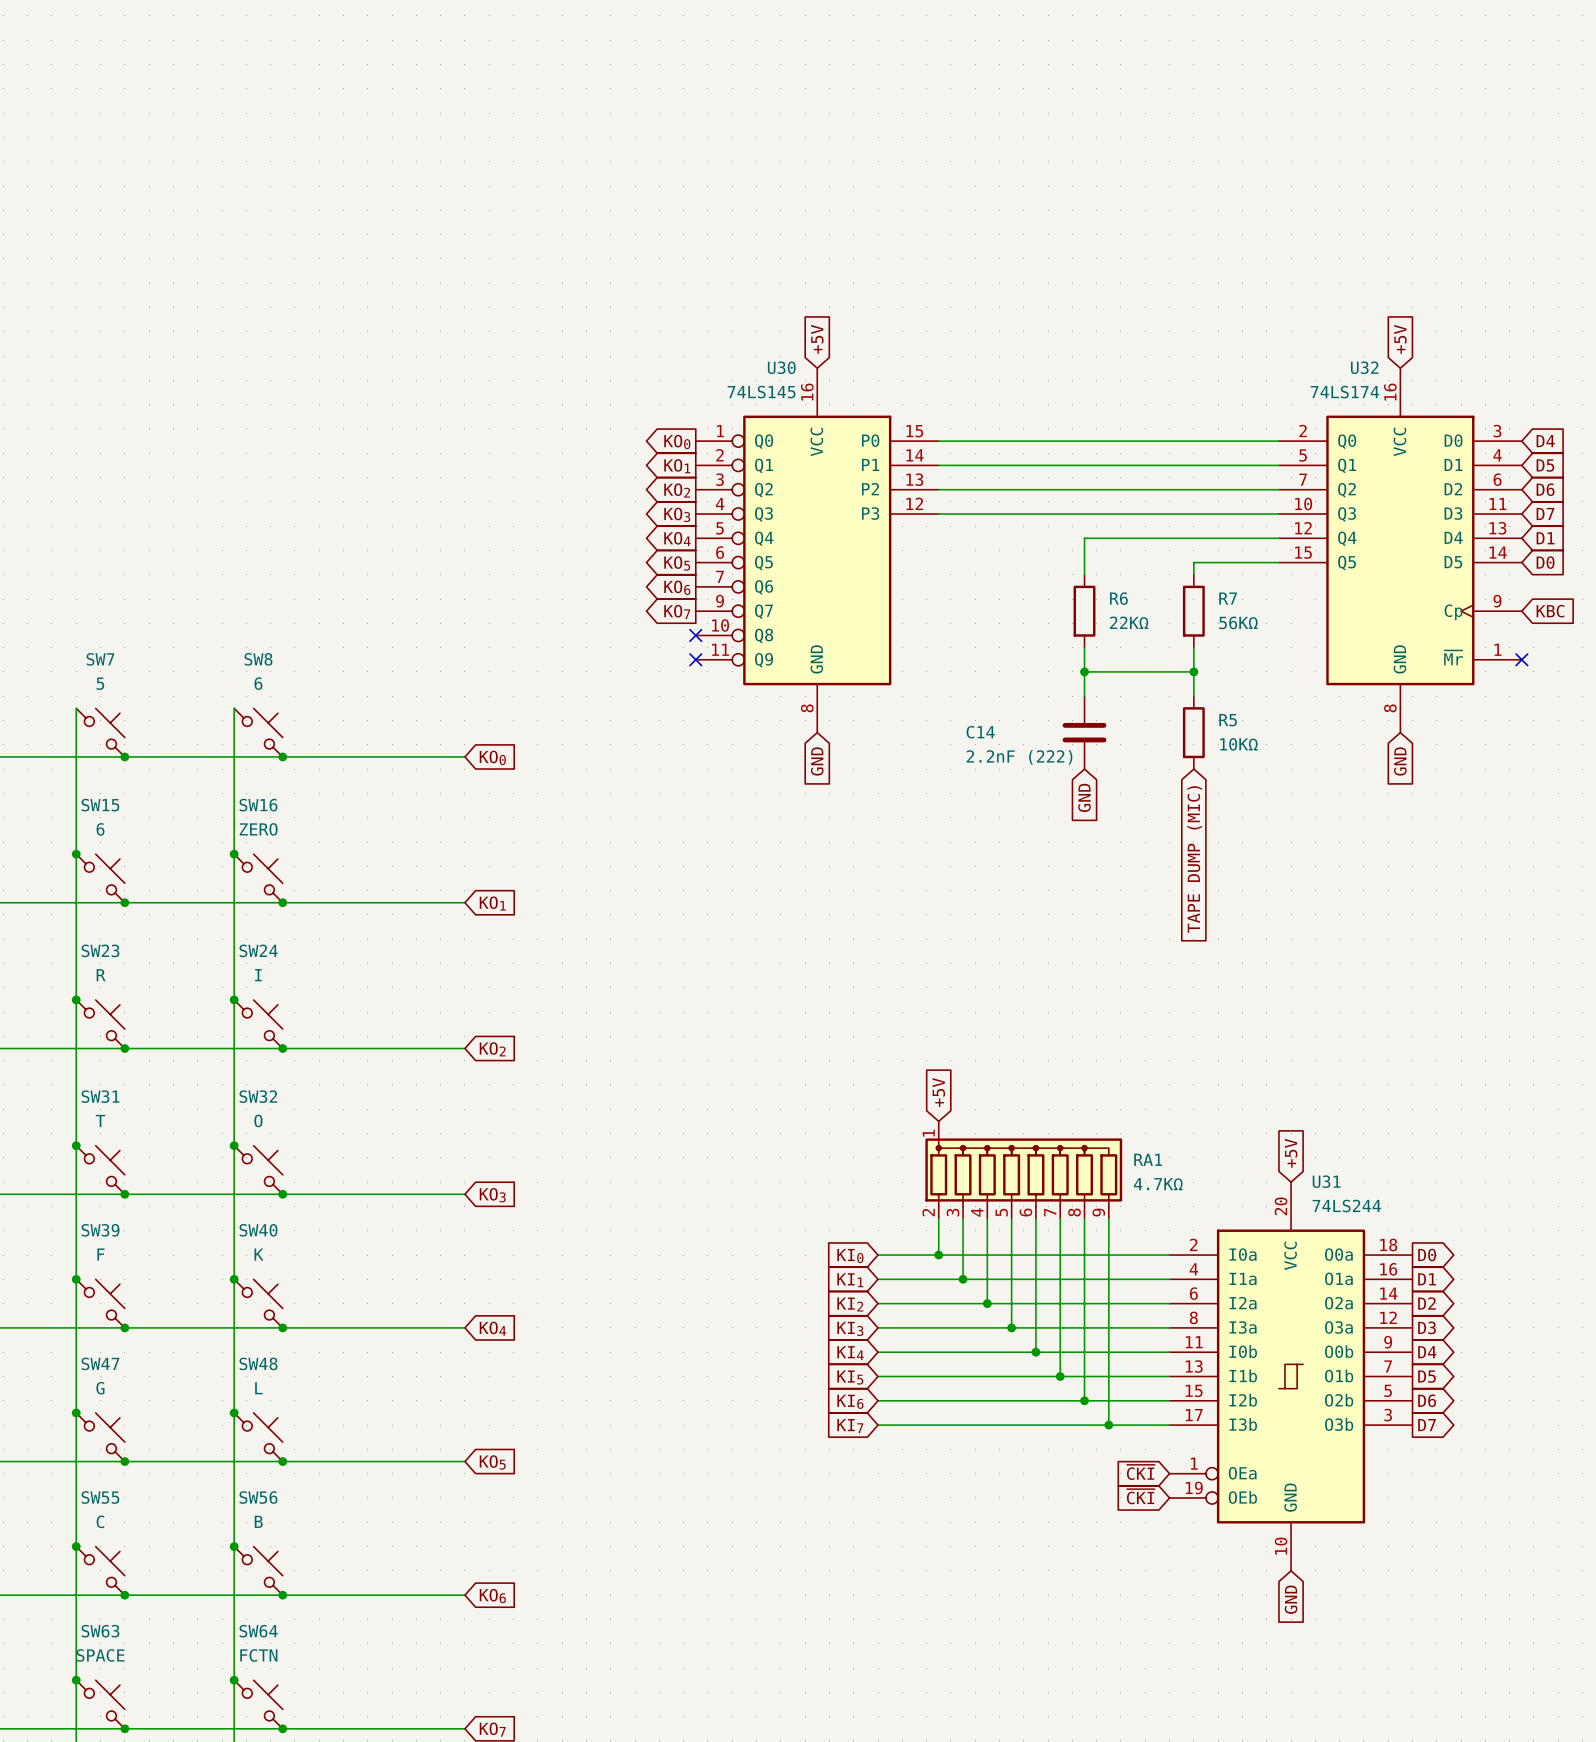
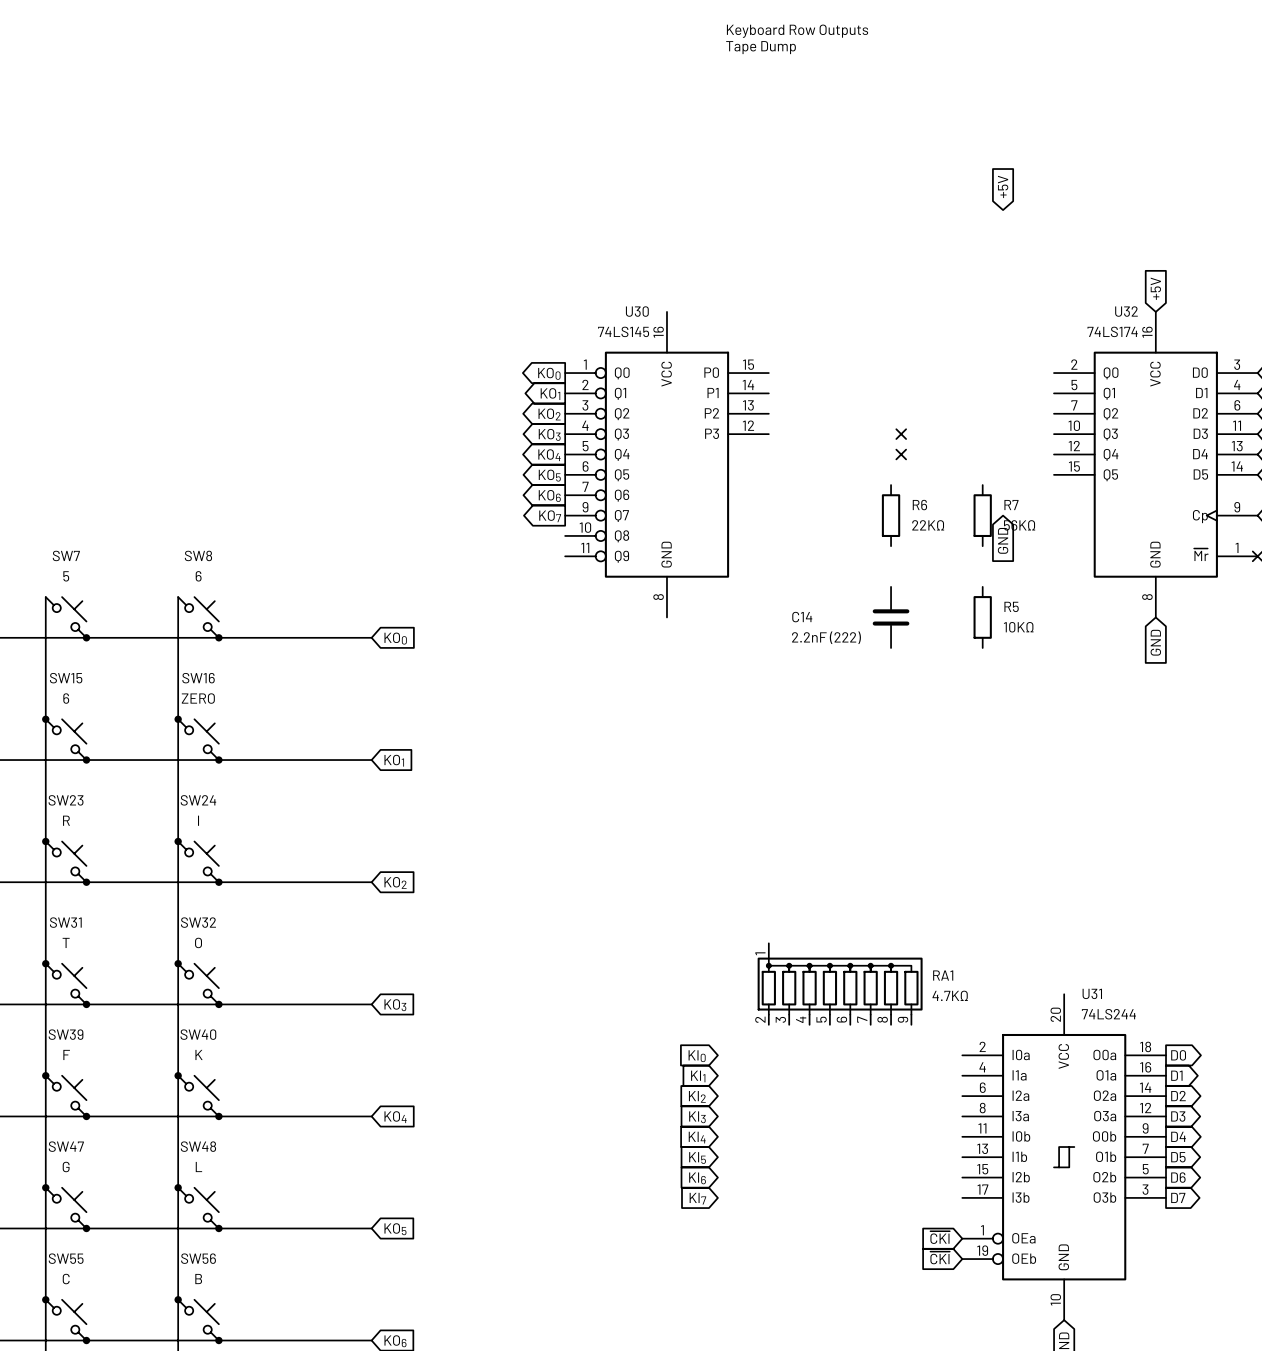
text: none -> Keyboard Row Outputs (797, 31)
text: none -> Tape Dump (761, 47)
global label: none -> +5V (1003, 186)
global label: +5V (817, 339) -> none
wire: (938, 441) (1278, 441) -> none
wire: (938, 465) (1278, 465) -> none
wire: (938, 489) (1278, 489) -> none
wire: (938, 514) (1278, 514) -> none
no-connect mark: none -> (901, 434)
no-connect mark: none -> (901, 454)
wire: (1278, 538) (1084, 538) (1084, 574) -> none
wire: (1278, 562) (1193, 562) (1193, 574) -> none
no-connect mark: (695, 635) -> none
wire: (1084, 647) (1084, 696) -> none
wire: (1193, 647) (1193, 696) -> none
no-connect mark: (695, 659) -> none
wire: (1084, 671) (1193, 671) -> none
junction: (1084, 671) -> none
junction: (1193, 671) -> none
global label: GND (817, 761) -> none
global label position: GND (1084, 797) -> GND (1003, 540)
global label: TAPE DUMP (MIC) (1194, 859) -> none
global label: +5V (938, 1092) -> none
global label: +5V (1291, 1153) -> none
wire: (938, 1218) (938, 1255) -> none
wire: (963, 1218) (963, 1279) -> none
wire: (987, 1218) (987, 1303) -> none
wire: (1011, 1218) (1011, 1327) -> none
wire: (1035, 1218) (1035, 1352) -> none
wire: (1060, 1218) (1060, 1376) -> none
wire: (1084, 1218) (1084, 1400) -> none
wire: (1108, 1218) (1108, 1425) -> none
wire: (878, 1255) (1169, 1255) -> none
junction: (938, 1255) -> none
wire: (878, 1279) (1169, 1279) -> none
junction: (963, 1279) -> none
wire: (878, 1303) (1169, 1303) -> none
junction: (987, 1303) -> none
wire: (878, 1327) (1169, 1327) -> none
junction: (1011, 1327) -> none
wire: (878, 1352) (1169, 1352) -> none
junction: (1035, 1352) -> none
wire: (878, 1376) (1169, 1376) -> none
junction: (1060, 1376) -> none
wire: (878, 1400) (1169, 1400) -> none
junction: (1084, 1400) -> none
wire: (878, 1425) (1169, 1425) -> none
junction: (1108, 1425) -> none

